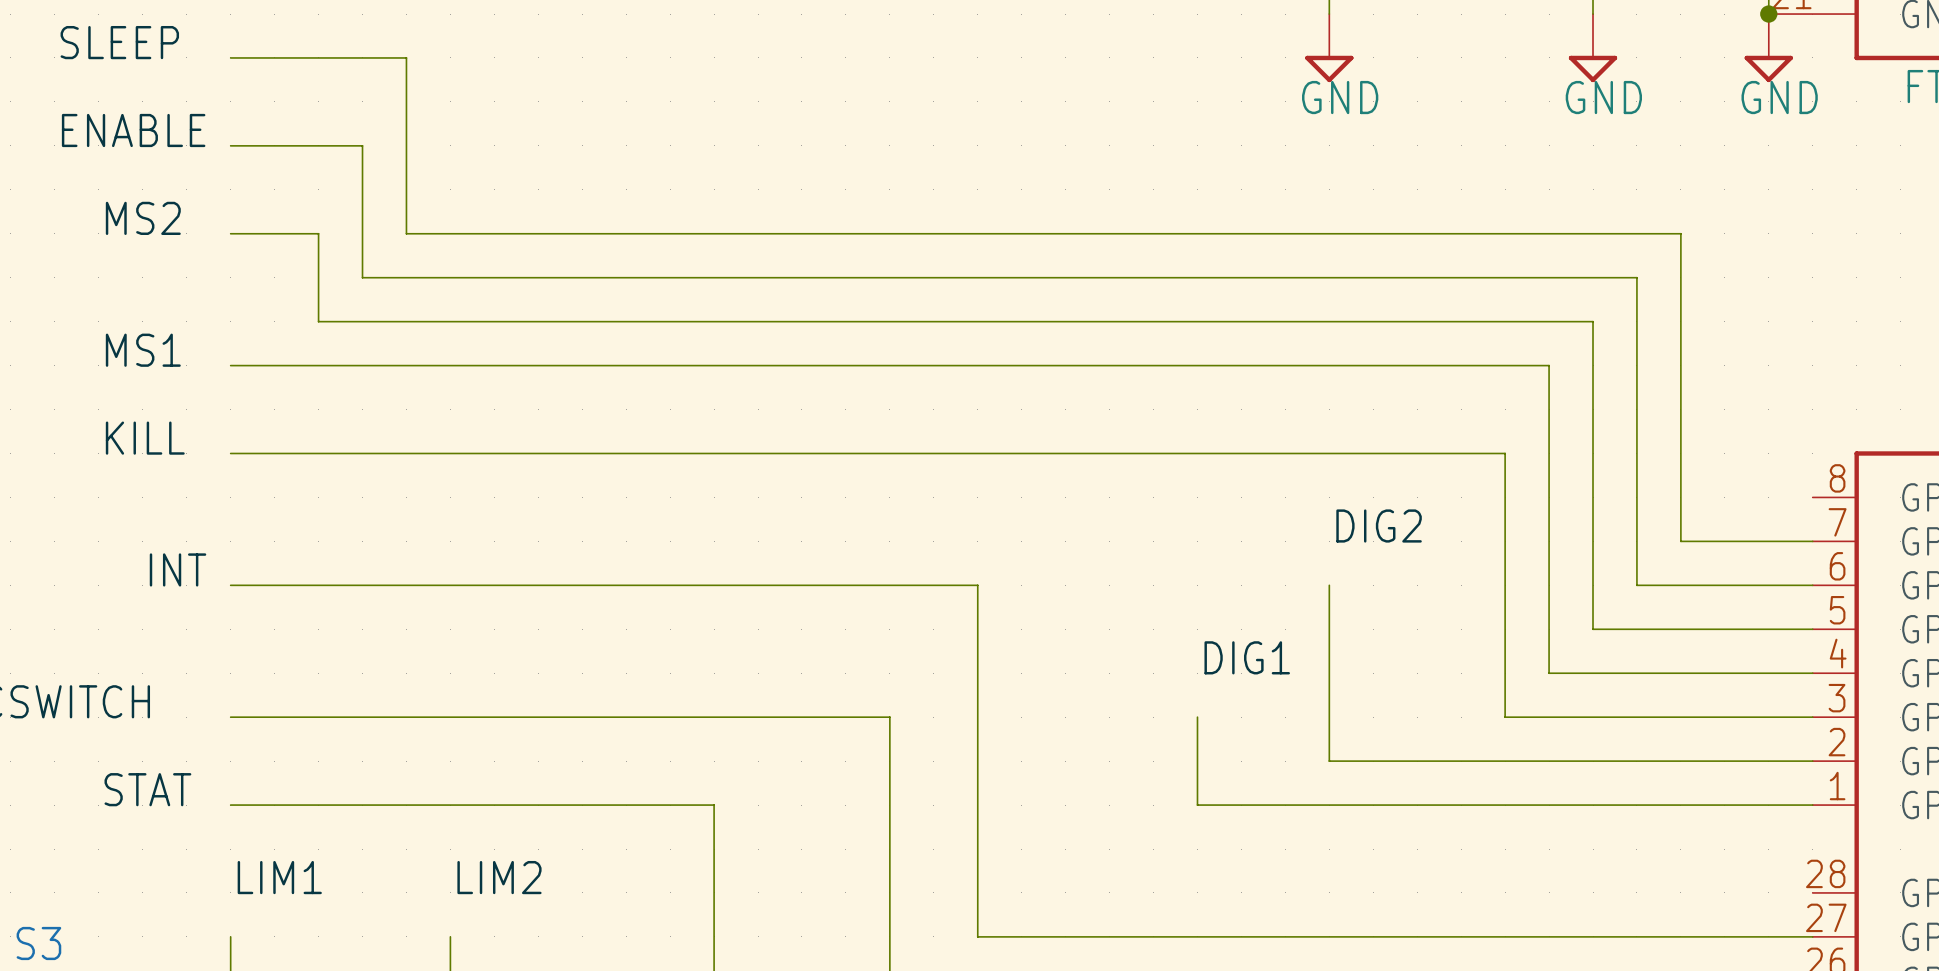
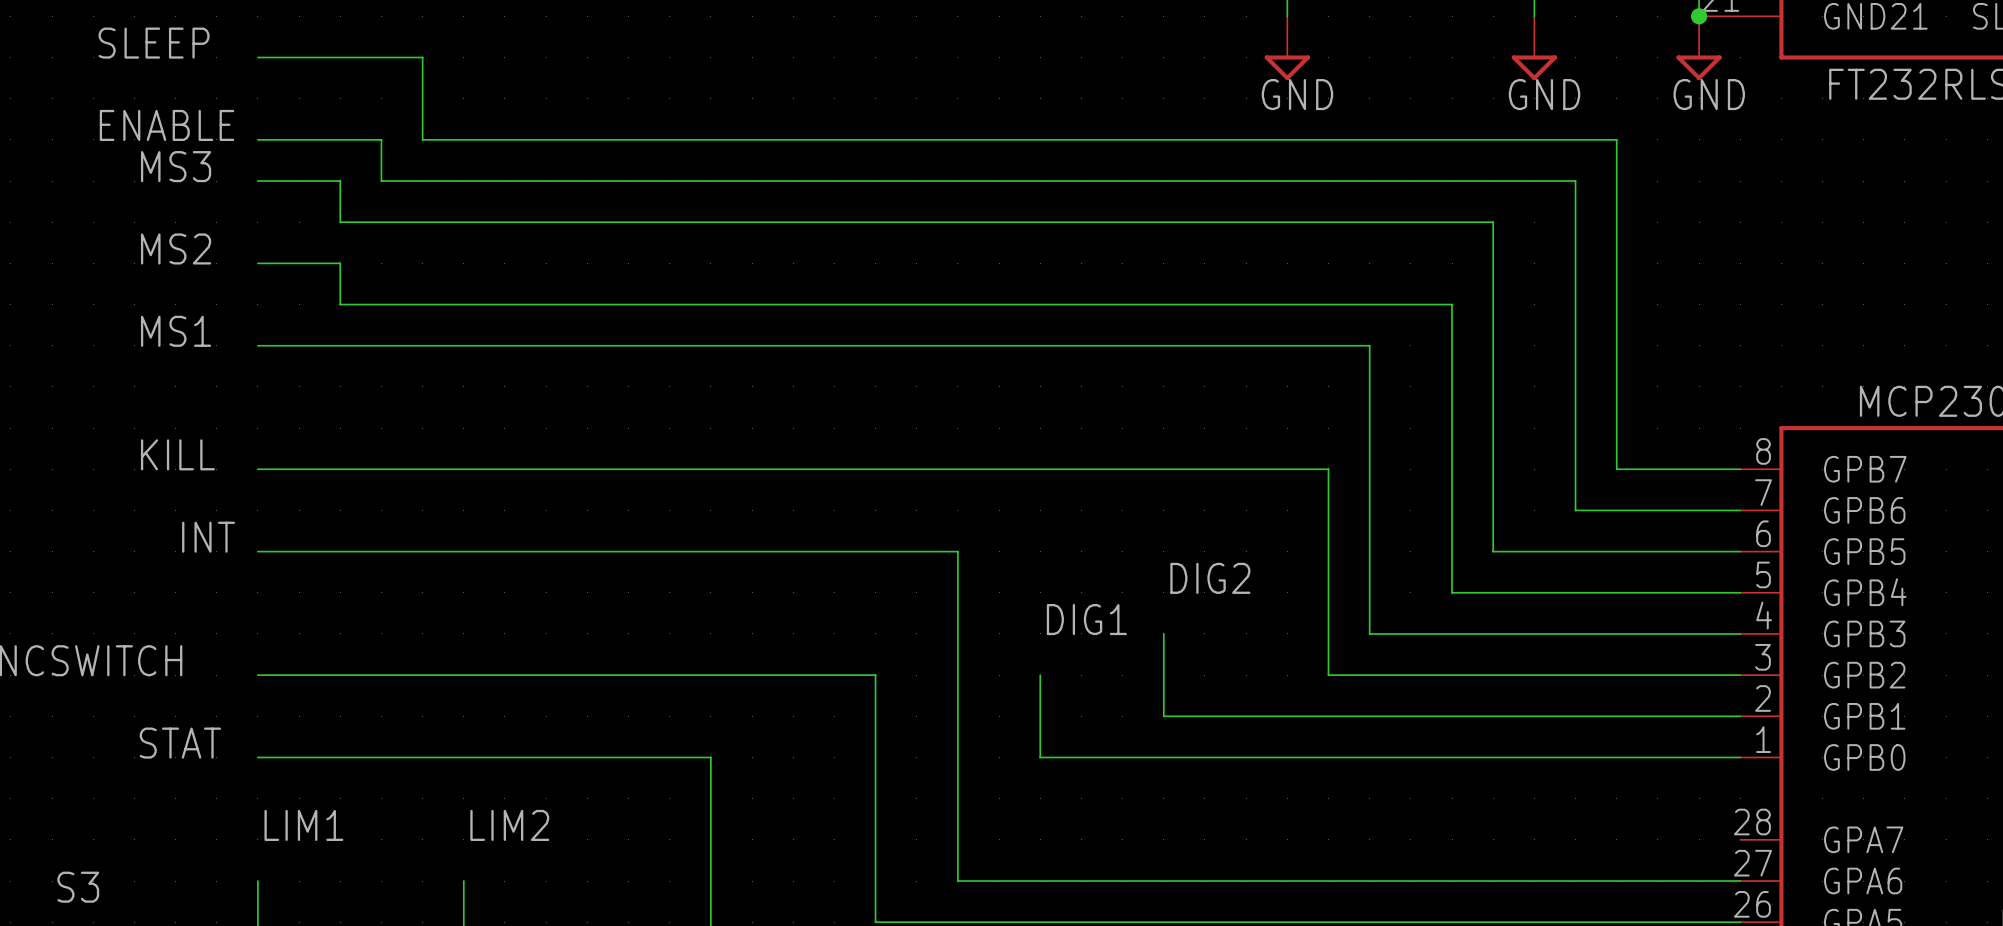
wire: (406, 145) (406, 233) -> (257, 181) (340, 181) (340, 222) (422, 222)
label: none -> MS3 (176, 166)
wire: (362, 189) (362, 277) (1636, 277) -> (381, 181) (1575, 181) (1575, 263)
label position: MS2 (143, 218) -> MS2 (176, 248)
wire: (230, 233) (318, 233) (318, 277) -> (257, 263) (340, 263)
wire: (1549, 233) (1680, 233) -> (422, 139) (1616, 139) (1616, 222)
wire: (1505, 321) (1593, 321) (1593, 629) -> (1452, 304) (1452, 428)
wire: (1417, 365) (1549, 365) -> (1493, 222) (1493, 345)
label position: KILL (145, 438) -> KILL (177, 454)
wire: (230, 453) (1505, 453) -> none
wire: none -> (257, 469) (1328, 469) (1328, 675) (1452, 675)
wire: (1680, 497) (1680, 541) -> (1575, 510) (1616, 510)
wire: none -> (1616, 469) (1740, 469)
label position: DIG2 (1379, 526) -> DIG2 (1210, 578)
wire: (1636, 541) (1636, 585) -> (1493, 551) (1575, 551)
wire: (1329, 585) (1329, 761) -> (1163, 716) (1287, 716)
wire: (1549, 585) (1549, 673) -> (1369, 345) (1369, 633) (1493, 633)
wire: (1505, 629) (1505, 717) -> (1452, 592) (1534, 592)
label position: DIG1 (1247, 657) -> DIG1 (1086, 619)
wire: none -> (1163, 633) (1163, 675)
wire: (1197, 761) (1197, 805) -> (1040, 675) (1040, 757) (1163, 757)

